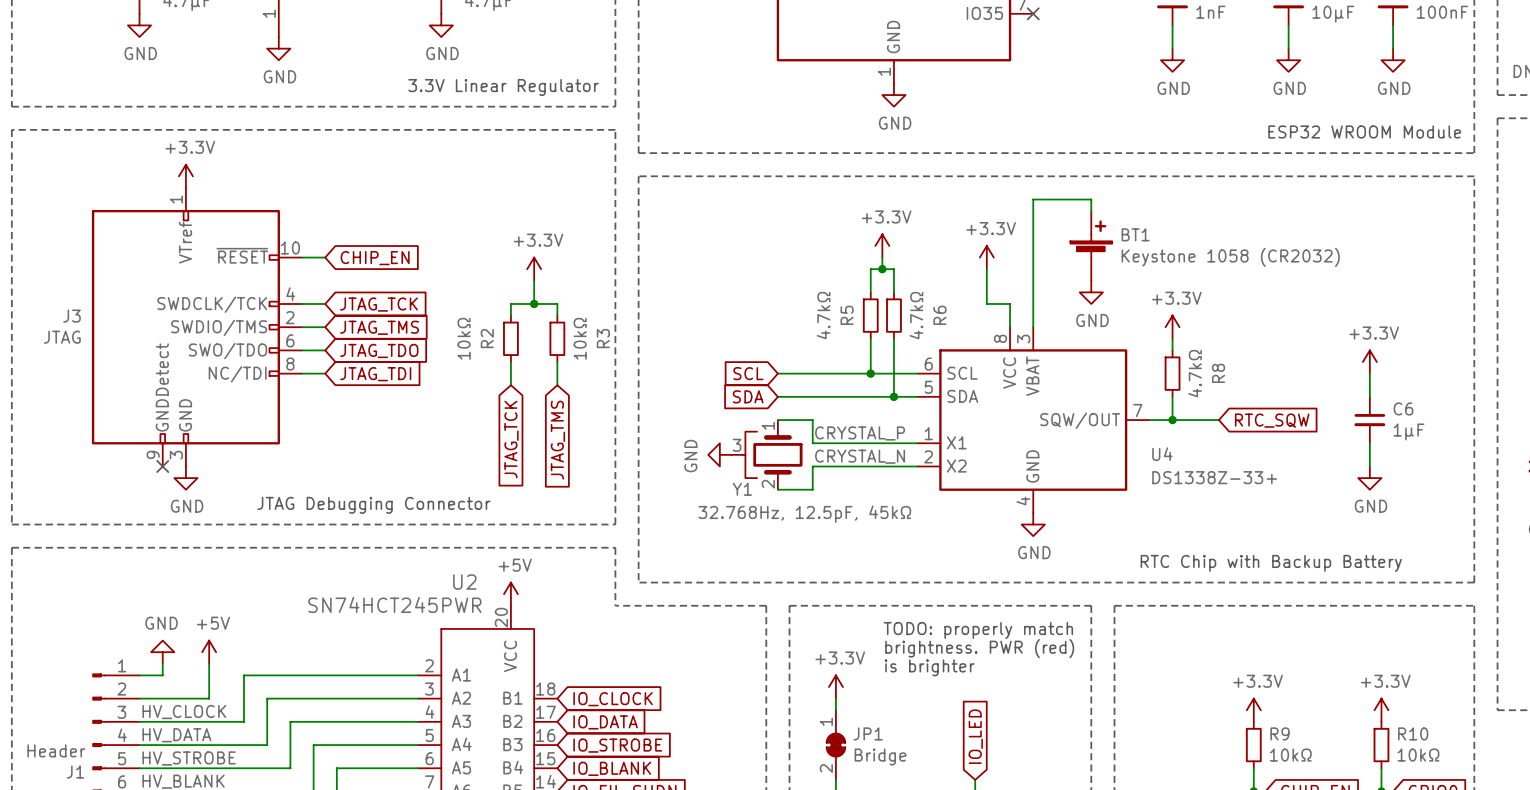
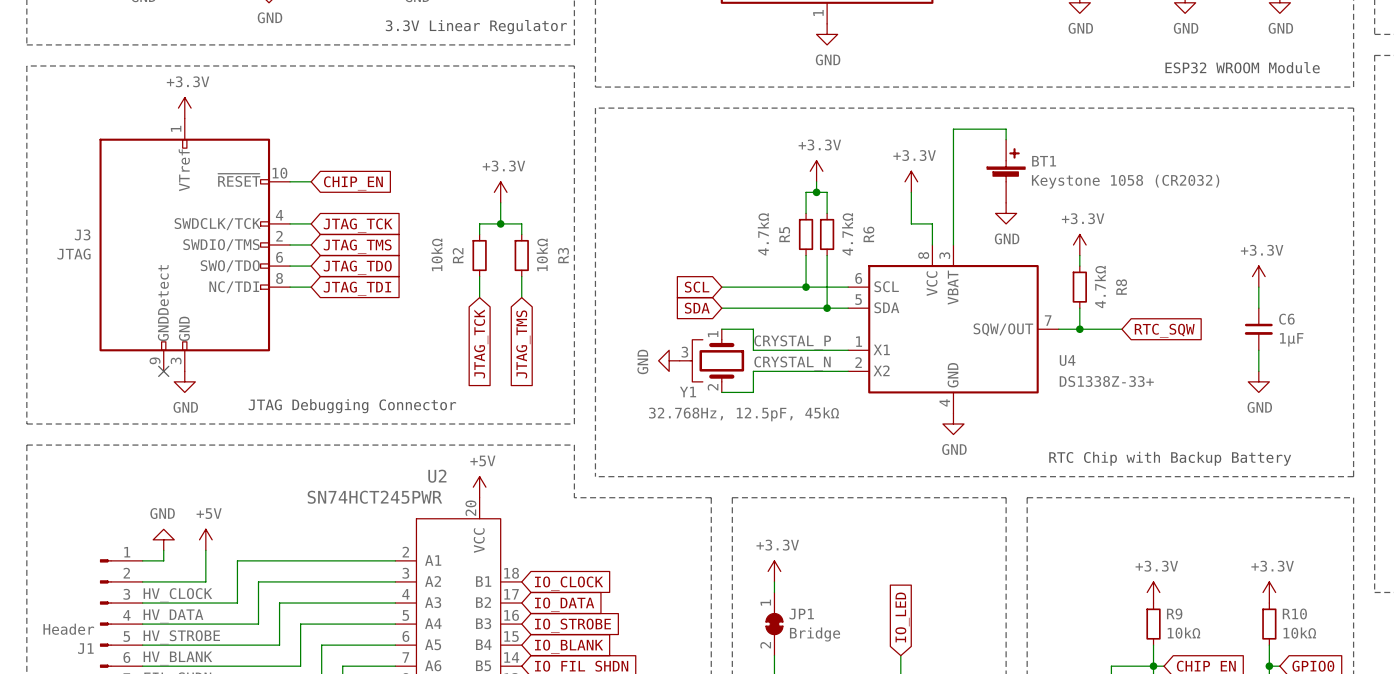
text: TODO: properly match (978, 630) -> none
text: brightness. PWR (red) (979, 648) -> none
text: is brighter (929, 667) -> none

